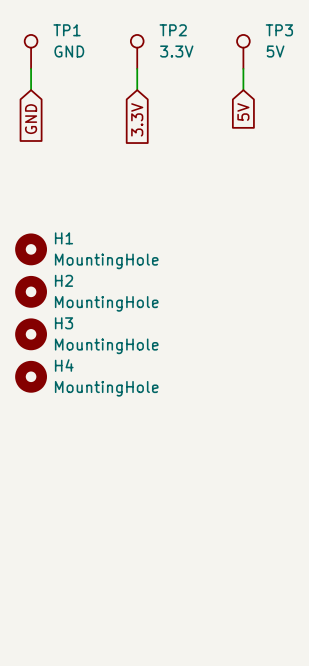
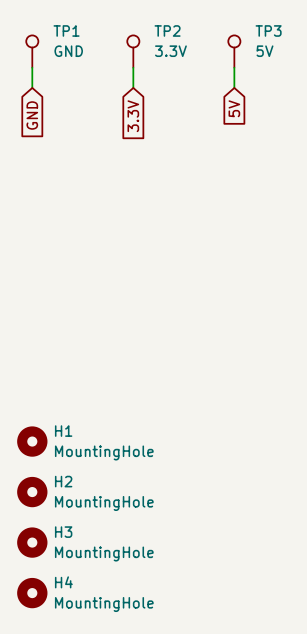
H1 position: (31, 249) -> (32, 441)
H2 position: (31, 291) -> (32, 492)
H3 position: (31, 334) -> (32, 542)
H4 position: (31, 376) -> (32, 593)

